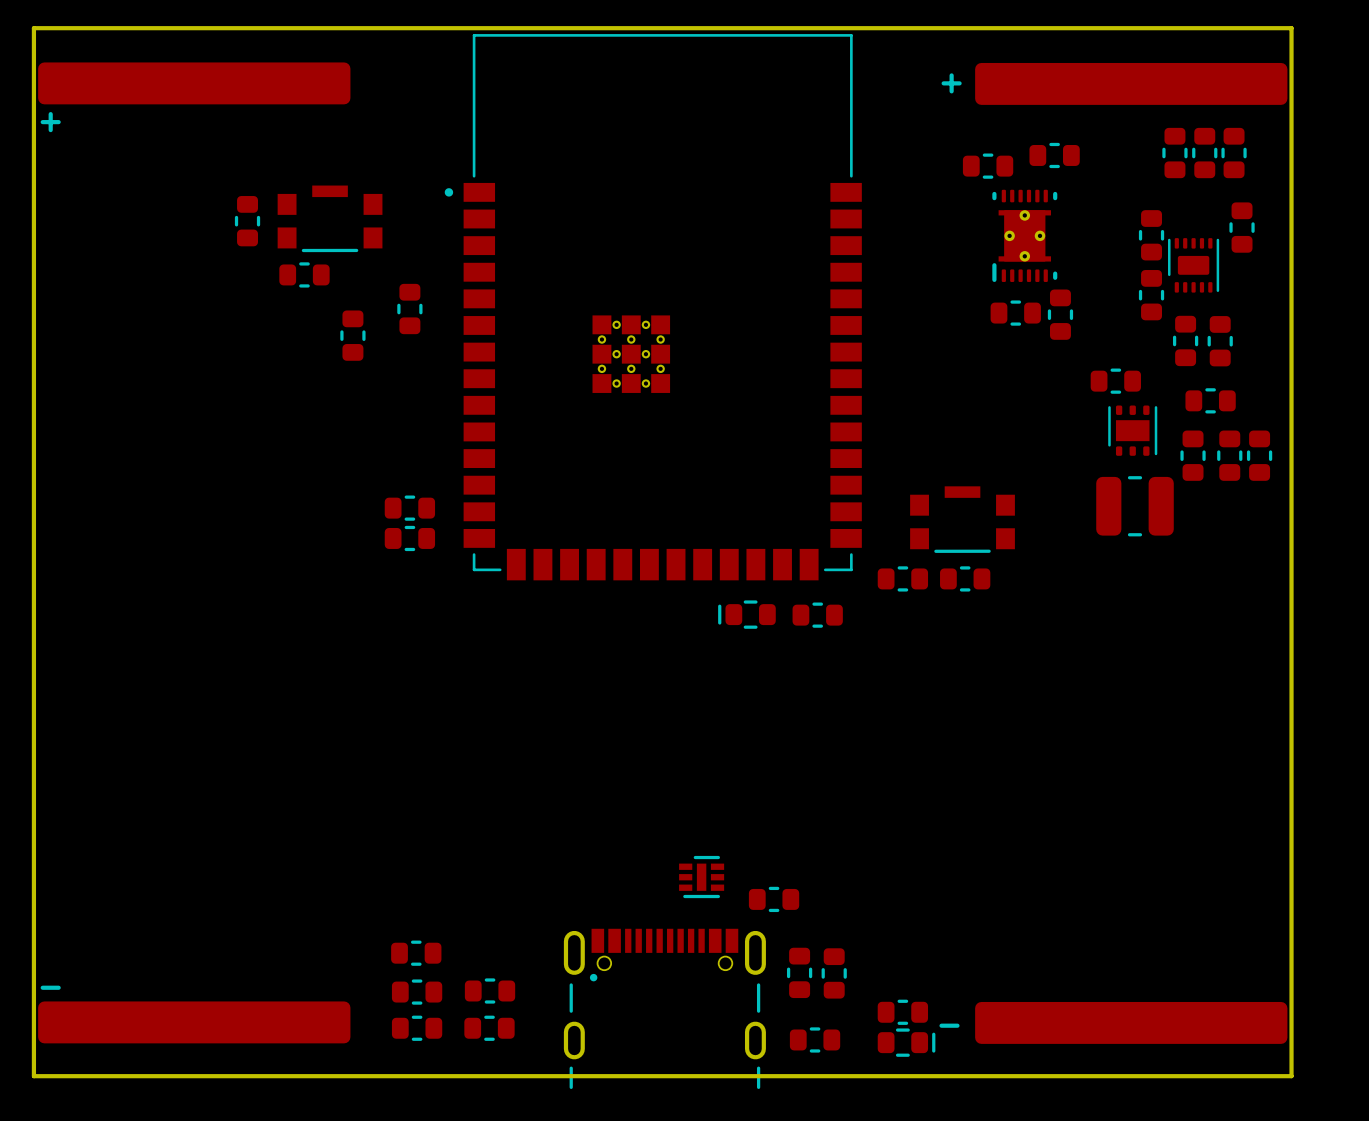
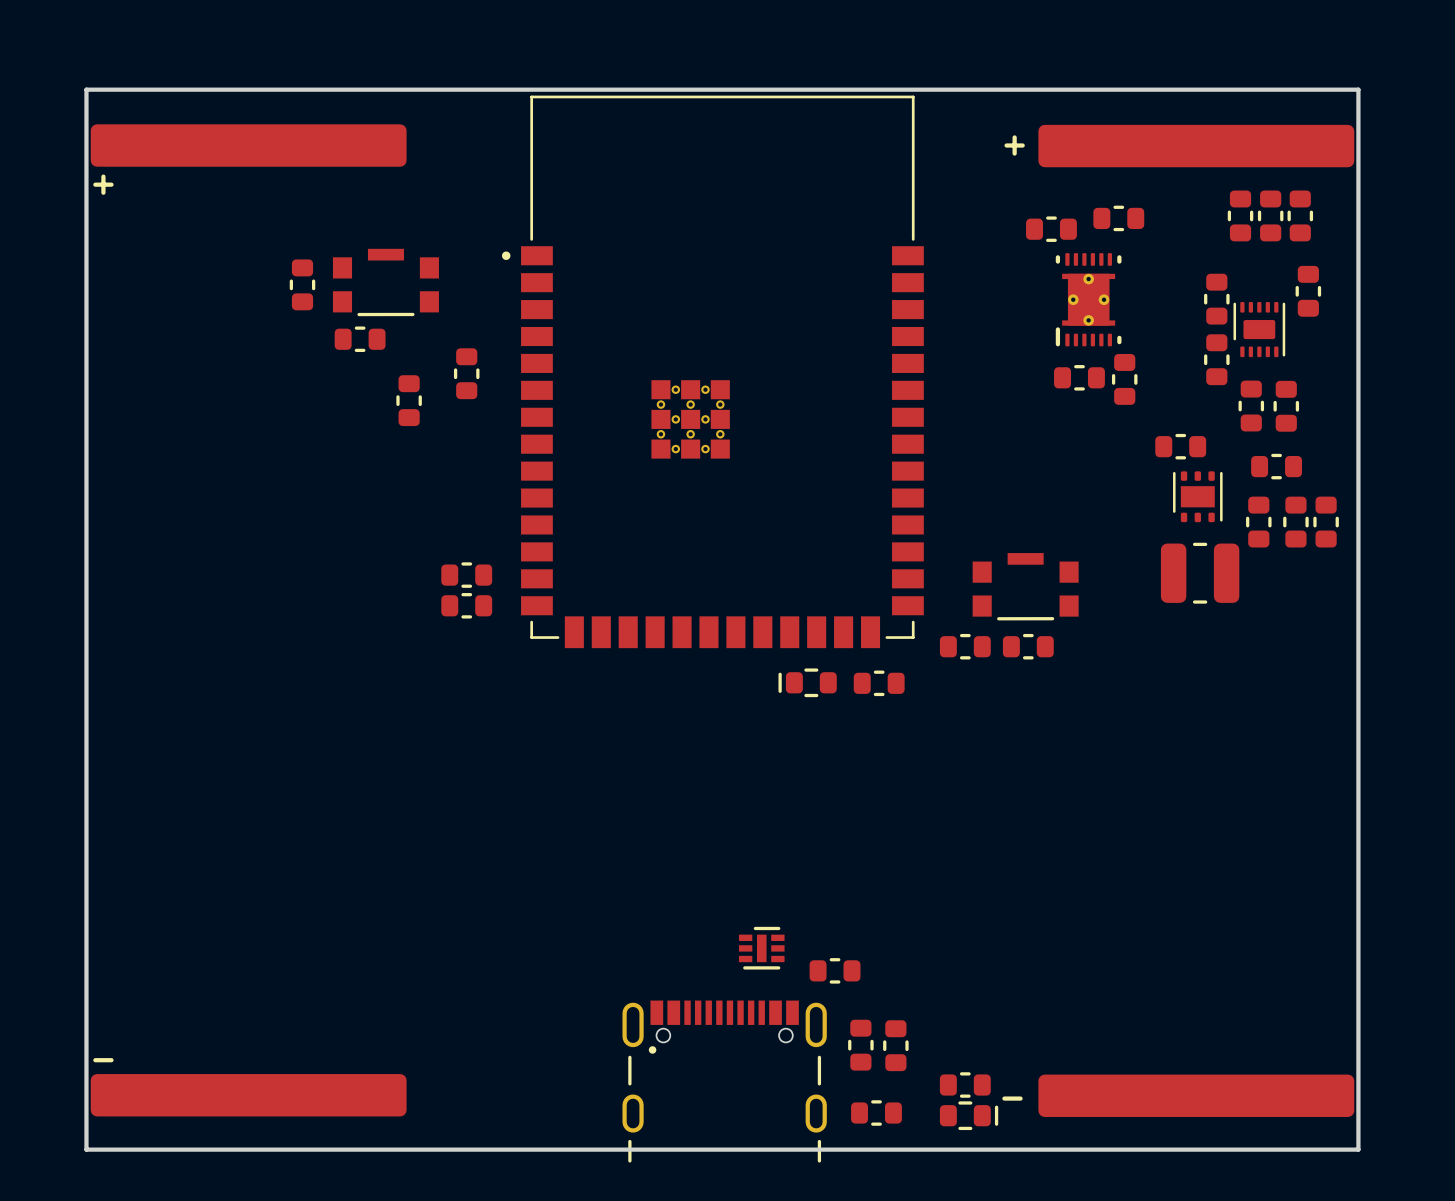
part: (416, 953) -> none
part: (490, 990) -> none
part: (417, 992) -> none
part: (417, 1028) -> none
part: (489, 1028) -> none

